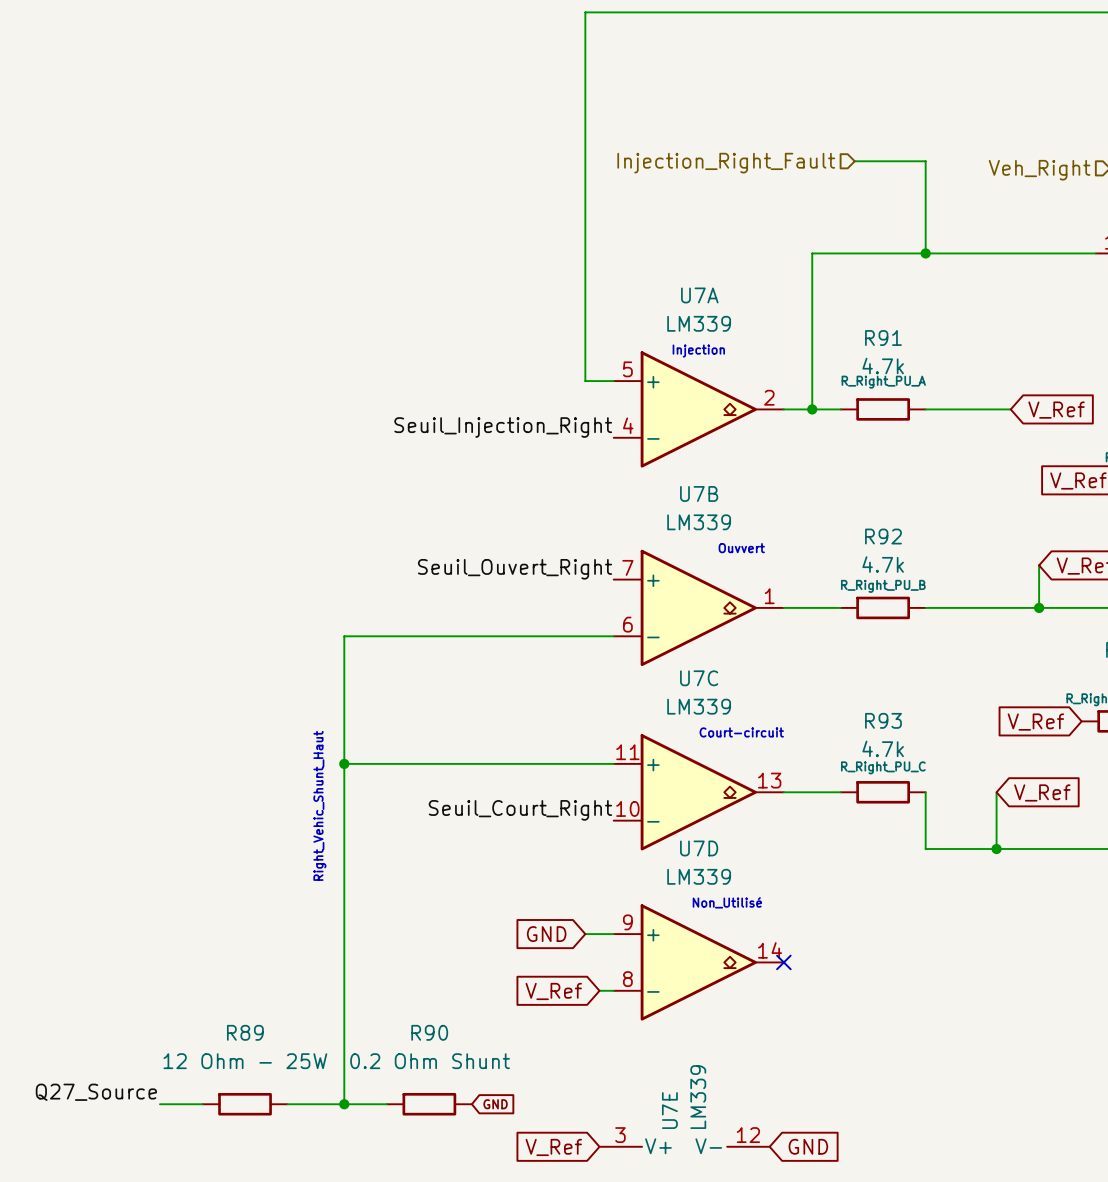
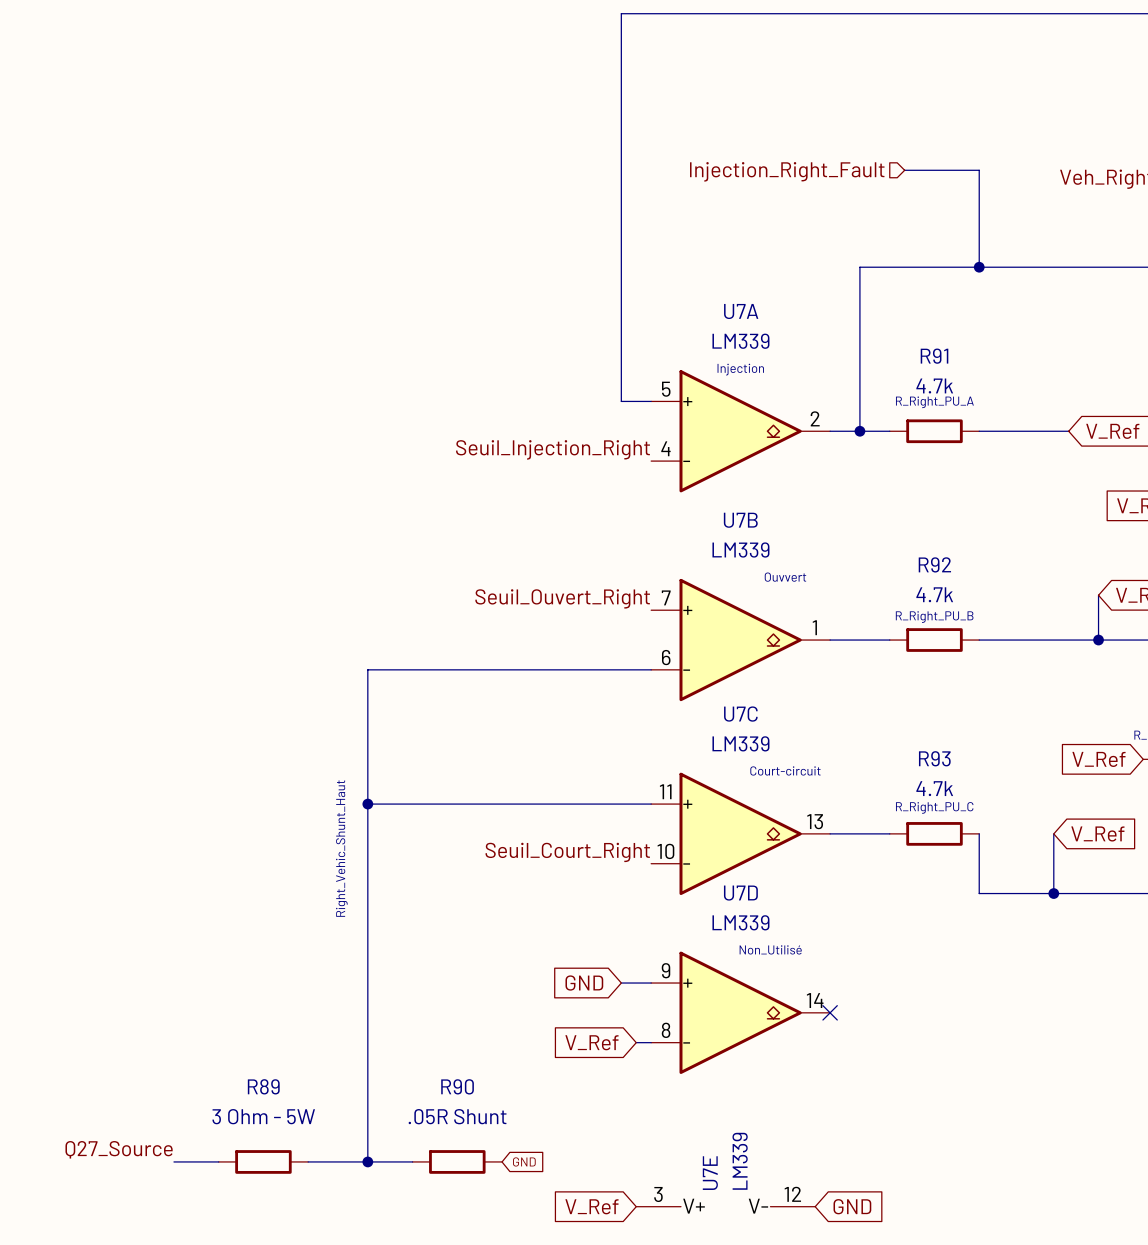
R89 value: 12 Ohm - 25W (245, 1061) -> 3 Ohm - 5W (263, 1116)
R90 value: 0.2 Ohm Shunt (430, 1061) -> .05R Shunt (457, 1116)

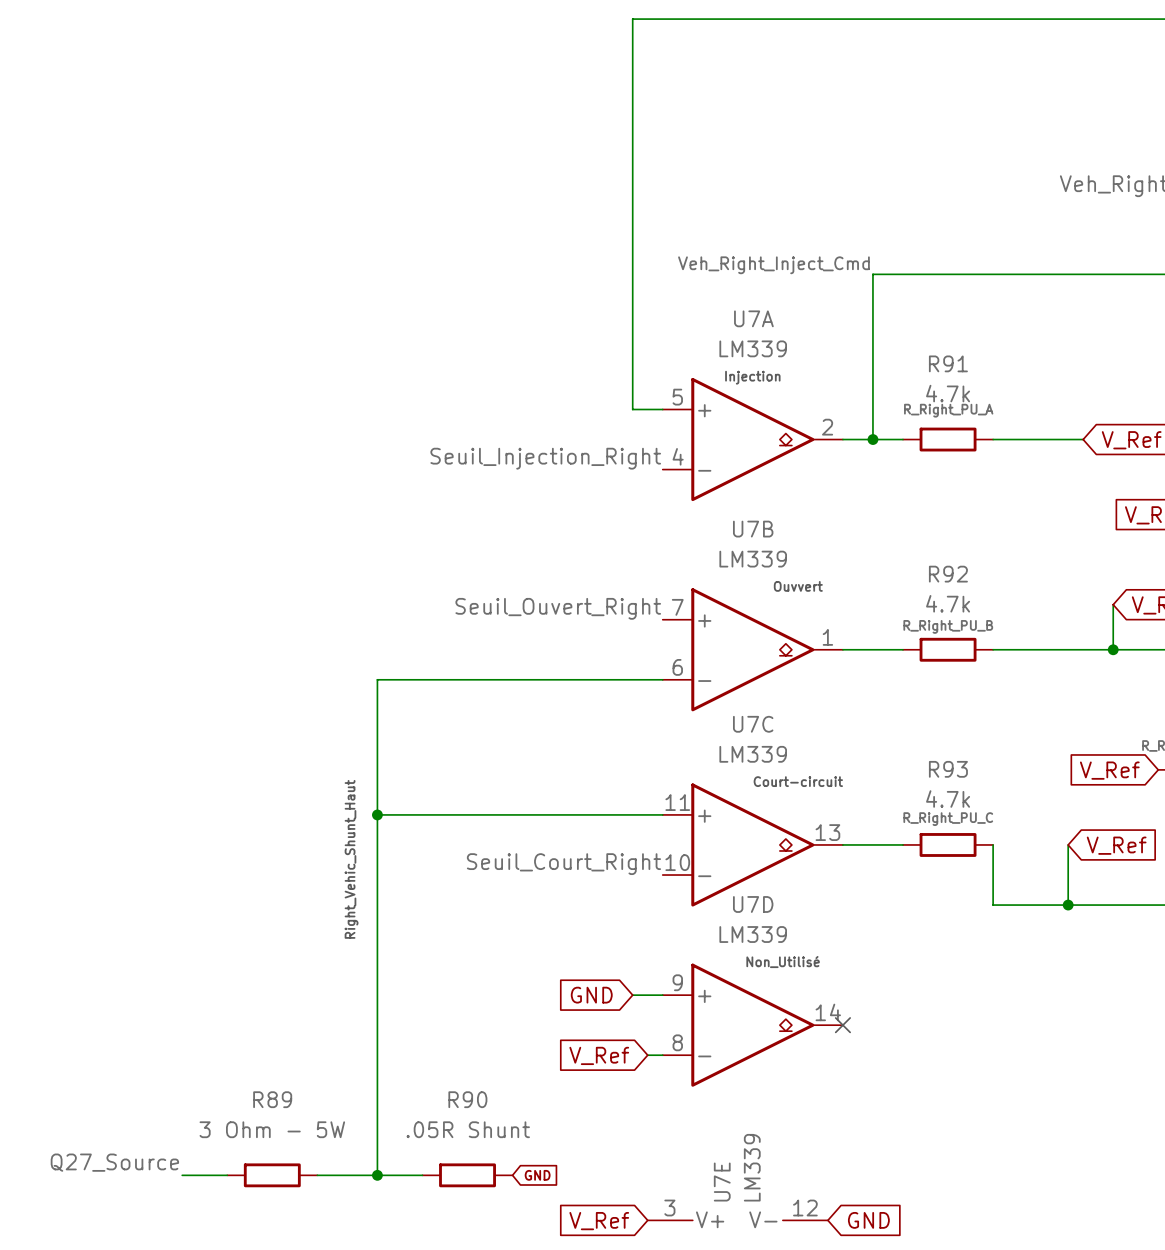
wire: (904, 170) (979, 170) (979, 267) -> none
hierarchical label: Injection_Right_Fault (787, 171) -> none
label: none -> Veh_Right_Inject_Cmd (773, 265)
junction: (979, 267) -> none

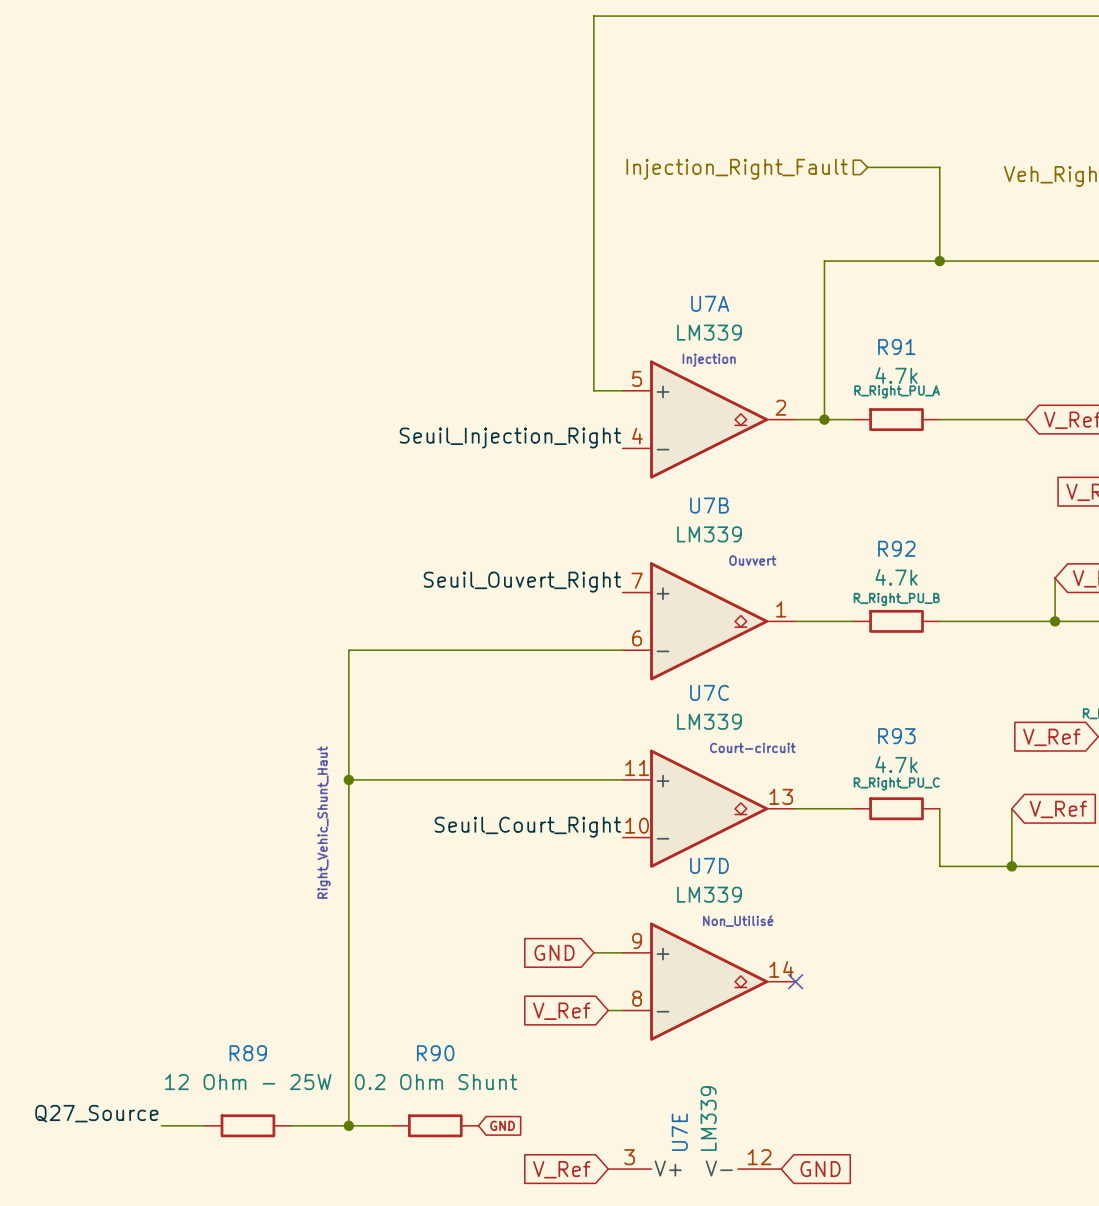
wire: none -> (867, 167) (939, 167) (939, 261)
hierarchical label: none -> Injection_Right_Fault (737, 169)
label: Veh_Right_Inject_Cmd (773, 265) -> none
junction: none -> (939, 261)
R89 value: 3 Ohm - 5W (272, 1129) -> 12 Ohm - 25W (248, 1082)
R90 value: .05R Shunt (468, 1129) -> 0.2 Ohm Shunt (436, 1082)

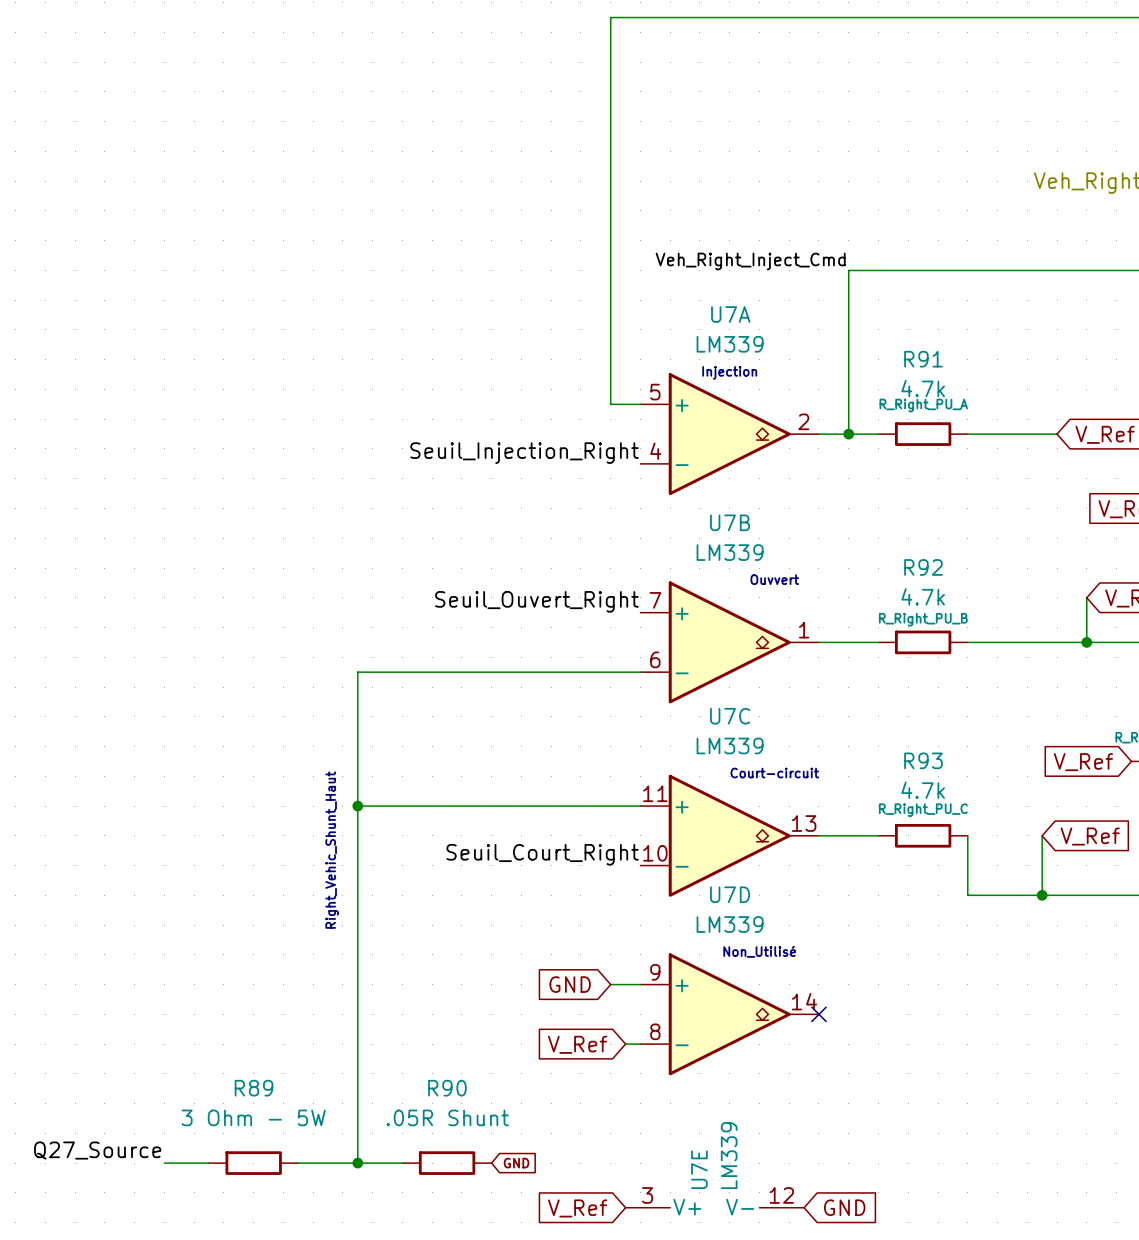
wire: (867, 167) (939, 167) (939, 261) -> none
hierarchical label: Injection_Right_Fault (737, 169) -> none
label: none -> Veh_Right_Inject_Cmd (750, 261)
junction: (939, 261) -> none
R89 value: 12 Ohm - 25W (248, 1082) -> 3 Ohm - 5W (253, 1117)
R90 value: 0.2 Ohm Shunt (436, 1082) -> .05R Shunt (447, 1117)

